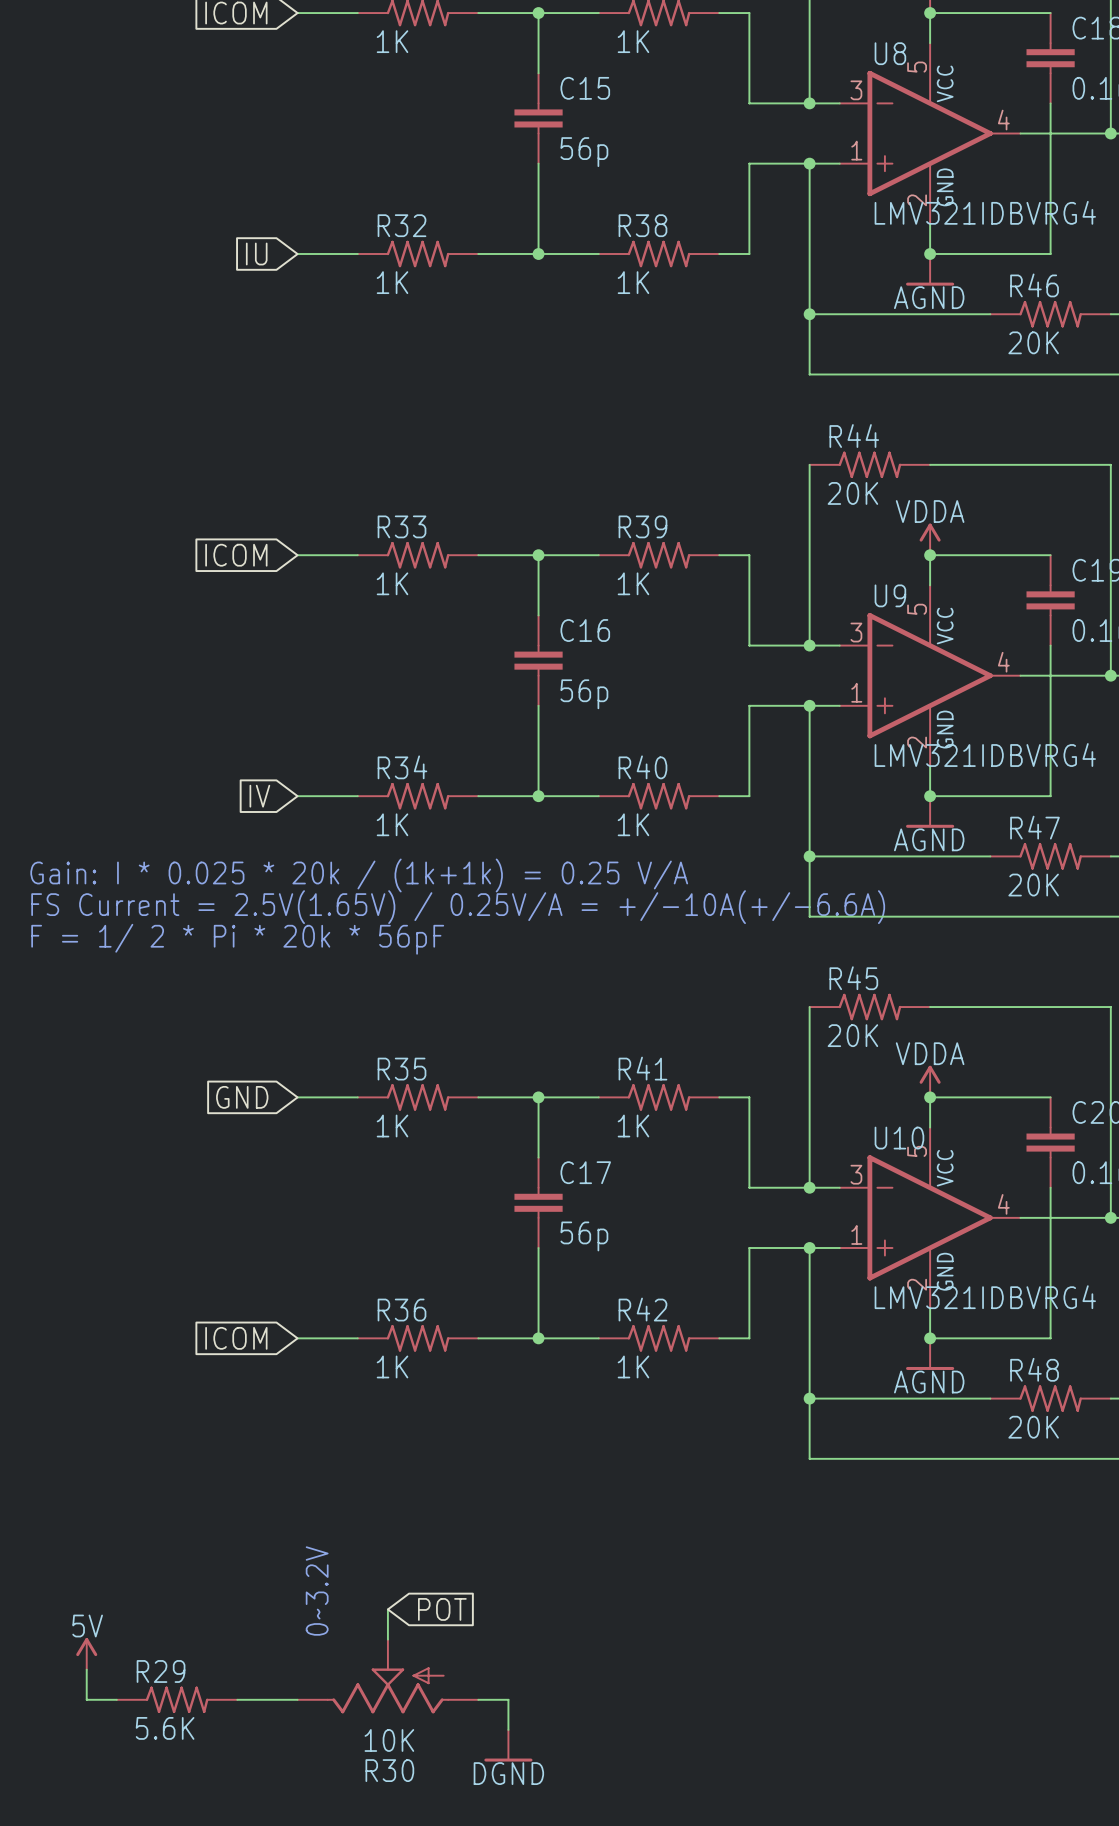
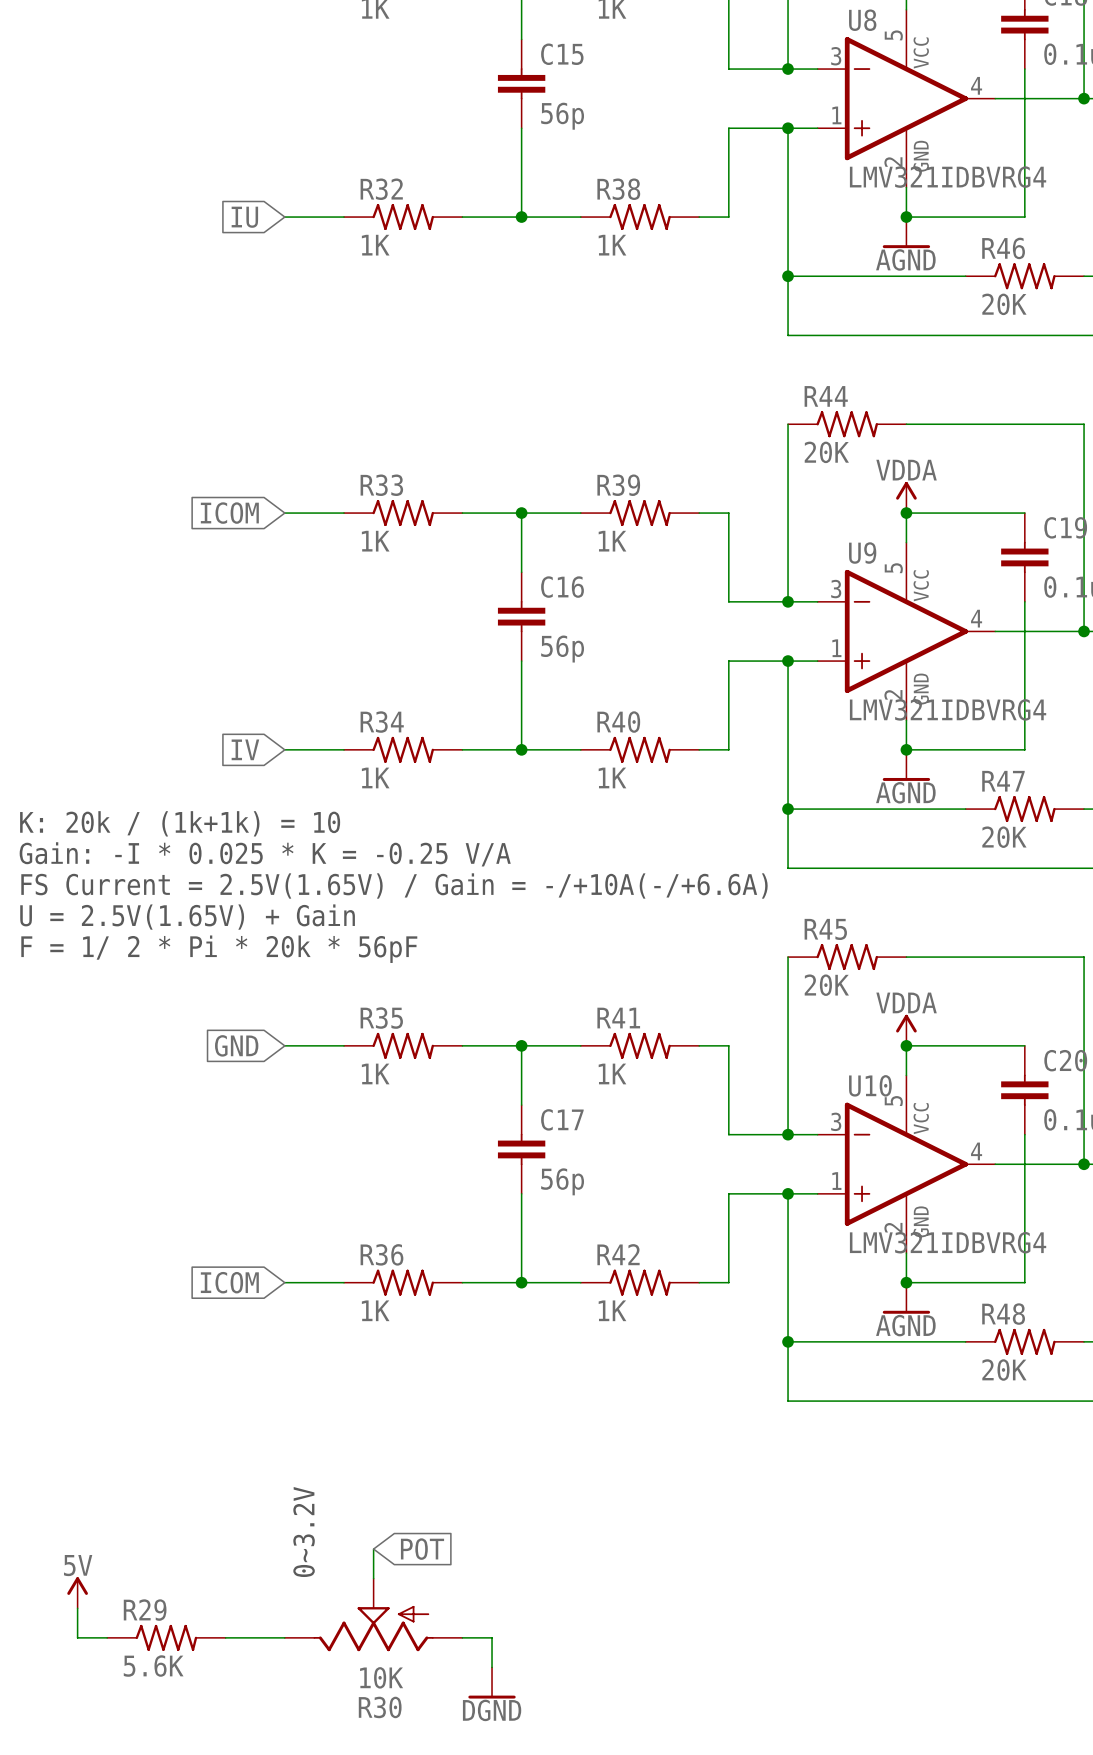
text: Gain: I * 0.025 * 20k / (1k+1k) = 0.25 V/A (359, 875) -> K: 20k / (1k+1k) = 10 (180, 823)
text: FS Current = 2.5V(1.65V) / 0.25V/A = +/-10A(+/-6.6A) (458, 907) -> Gain: -I * 0.025 * K = -0.25 V/A (265, 854)
text: F = 1/ 2 * Pi * 20k * 56pF (237, 939) -> FS Current = 2.5V(1.65V) / Gain = -/+10A(-/+6.6A) (394, 885)
text: none -> U = 2.5V(1.65V) + Gain (187, 917)
text: none -> F = 1/ 2 * Pi * 20k * 56pF (219, 949)

